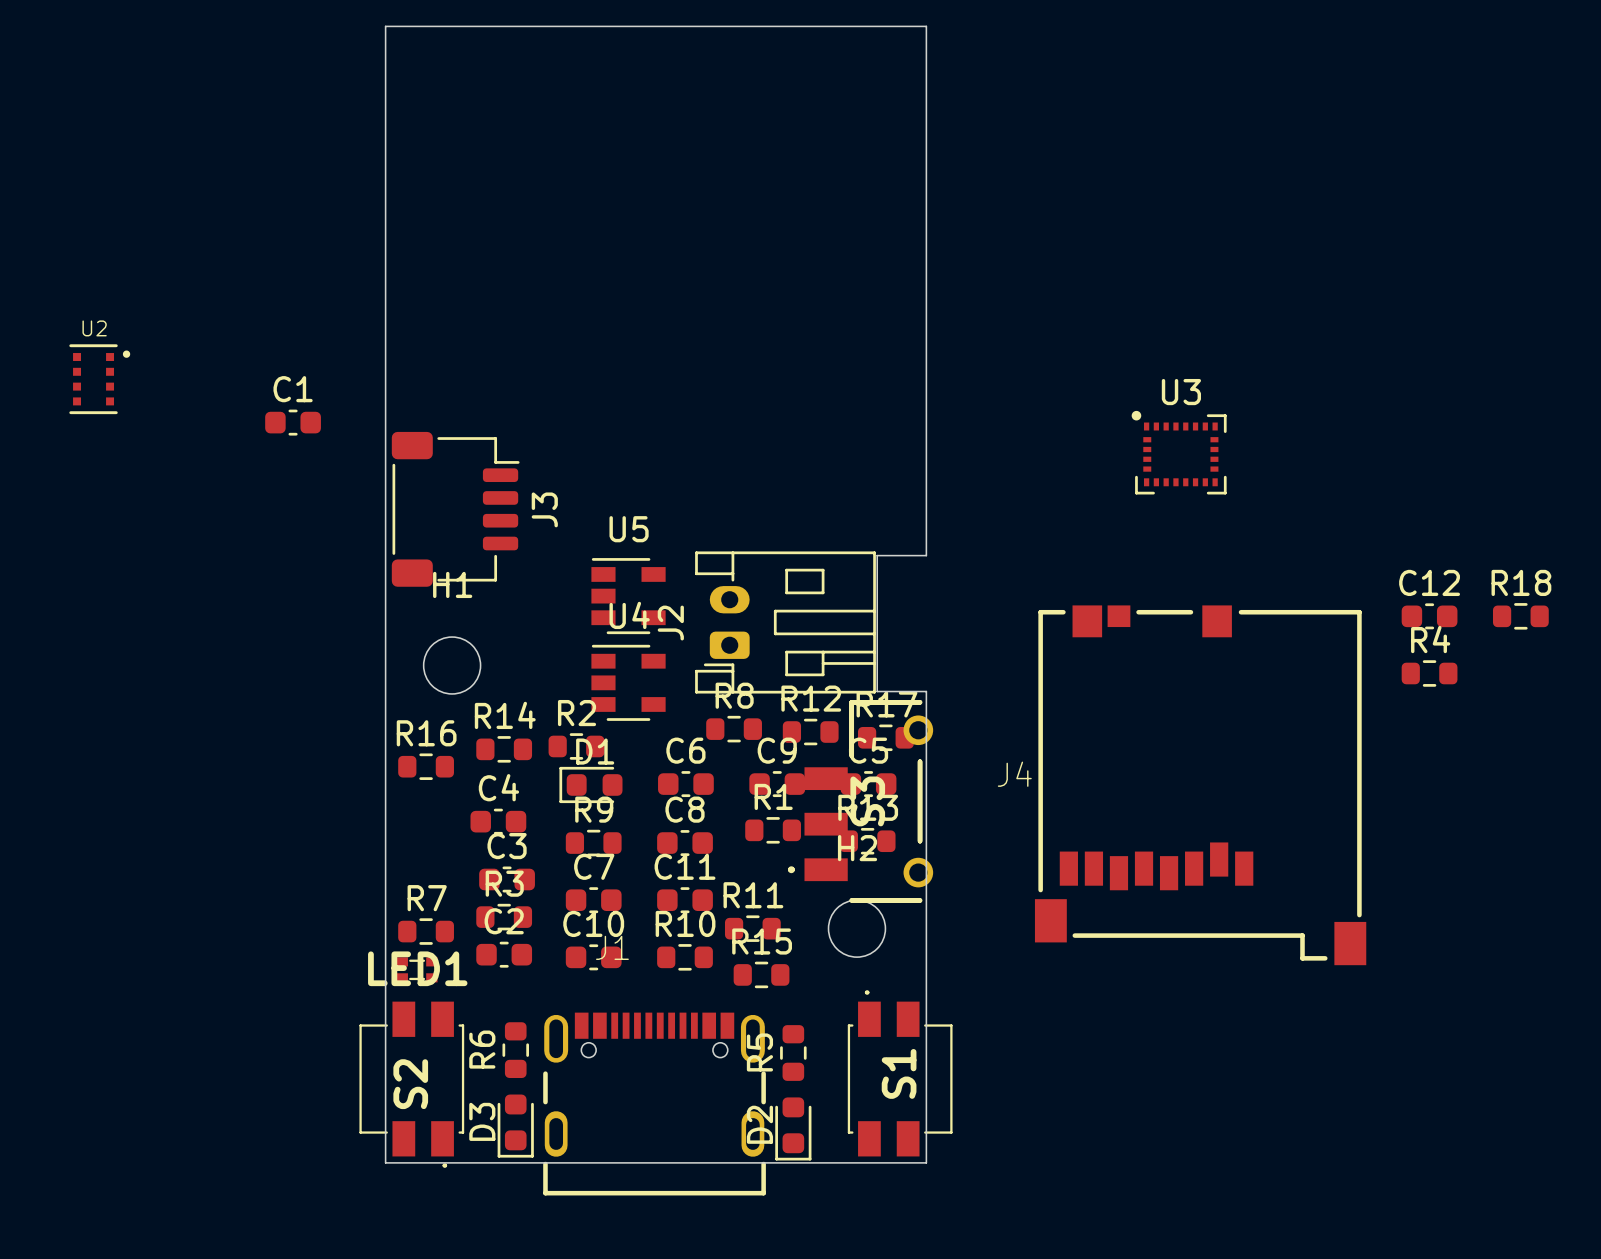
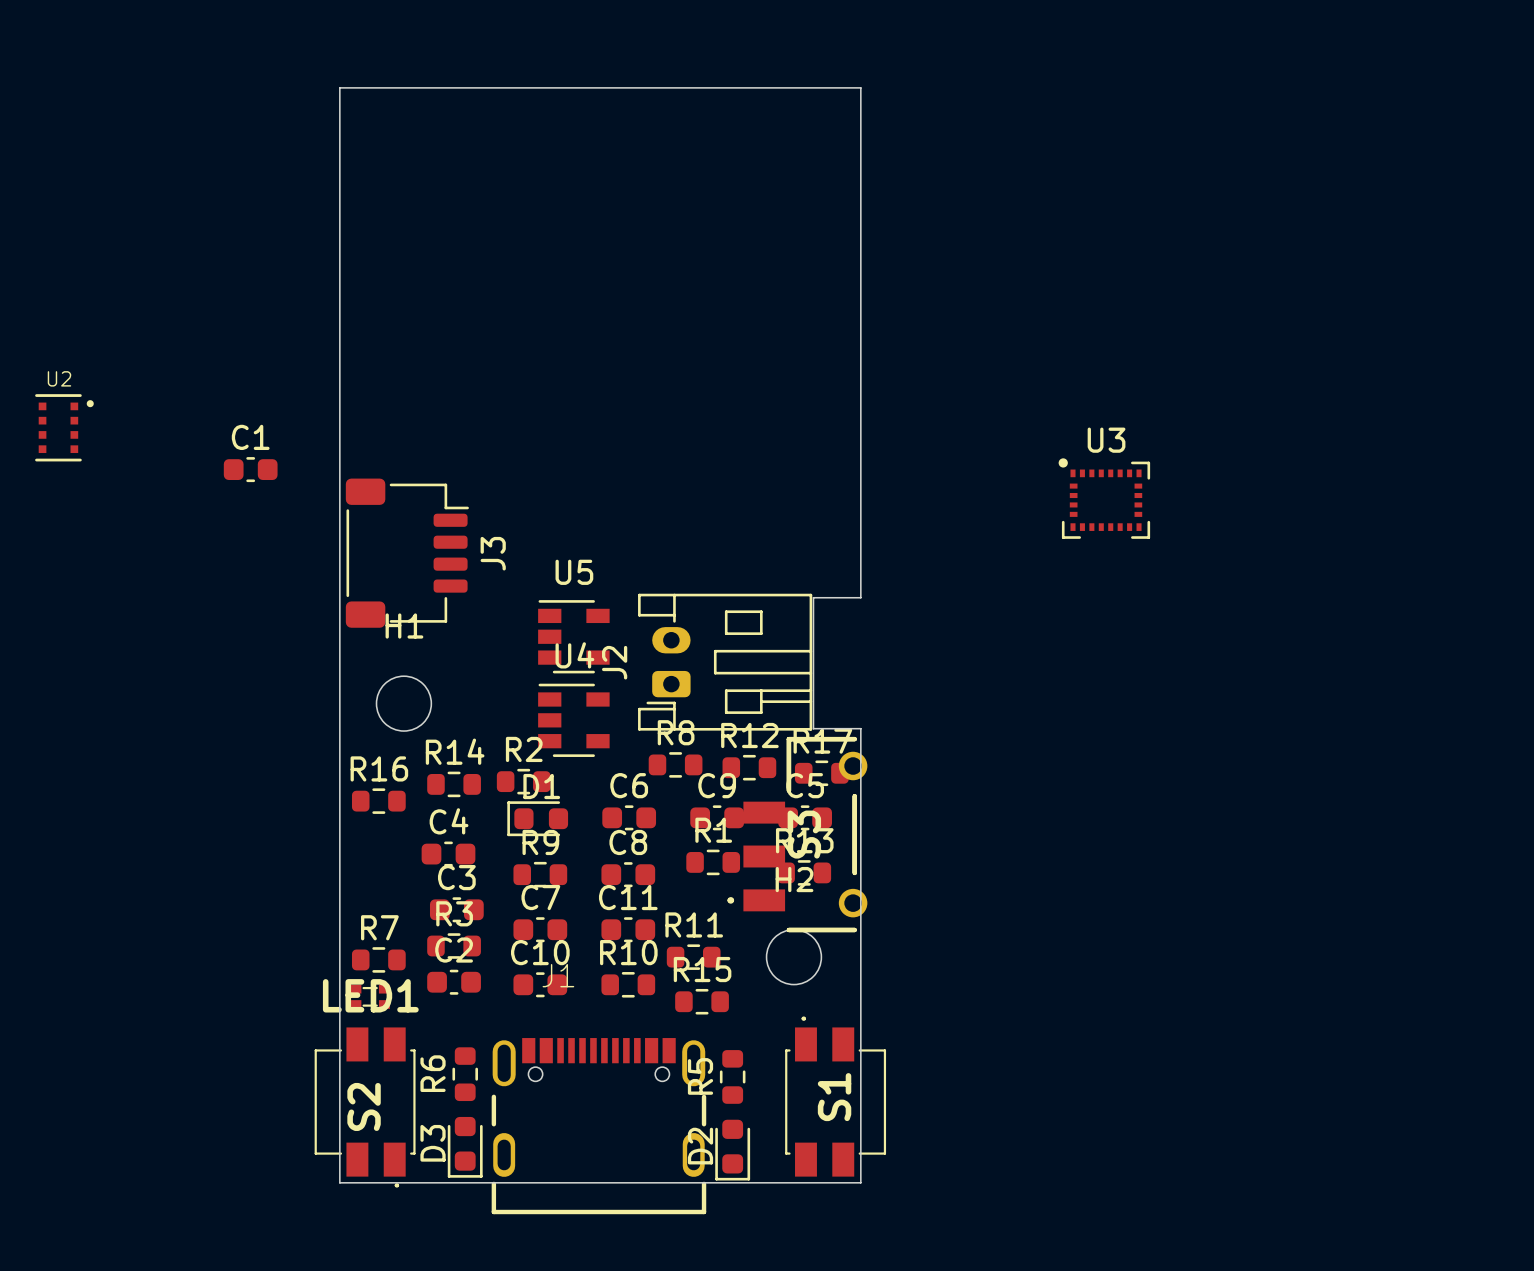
C12: (1429, 616) -> none
R18: (1520, 616) -> none
R4: (1429, 673) -> none
J4: (1200, 785) -> none

